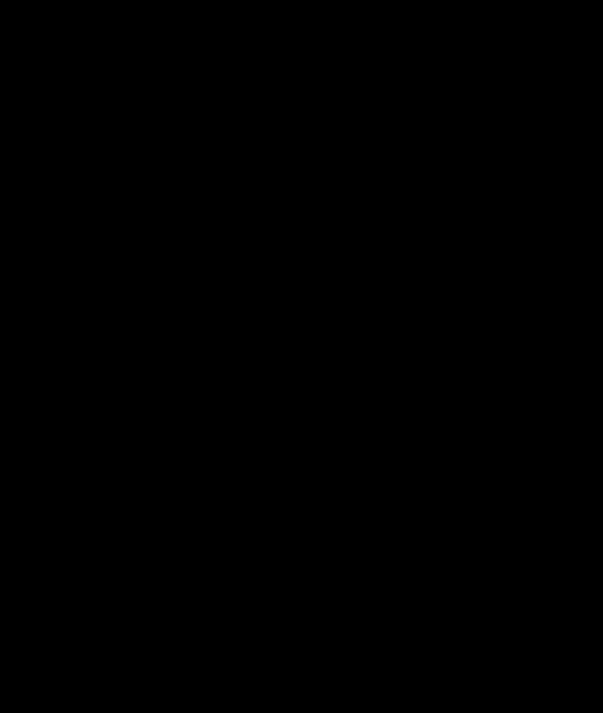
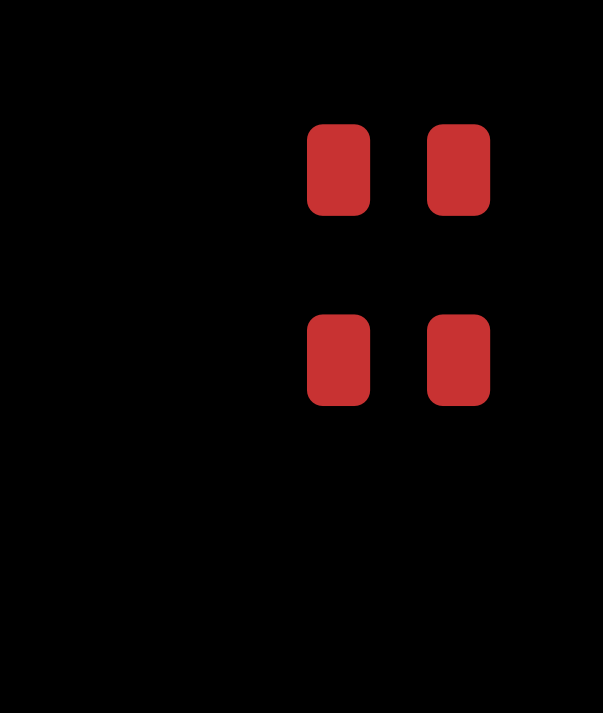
part: none -> (398, 170)
part: none -> (398, 360)

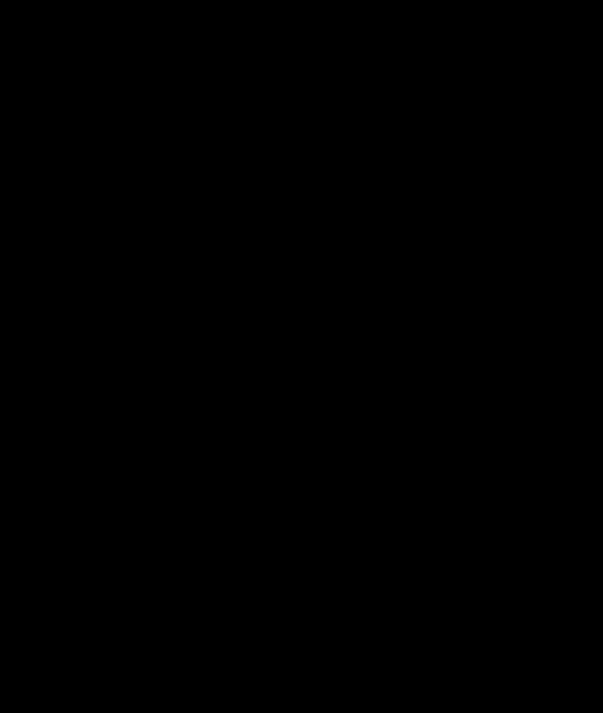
part: (398, 170) -> none
part: (398, 360) -> none

